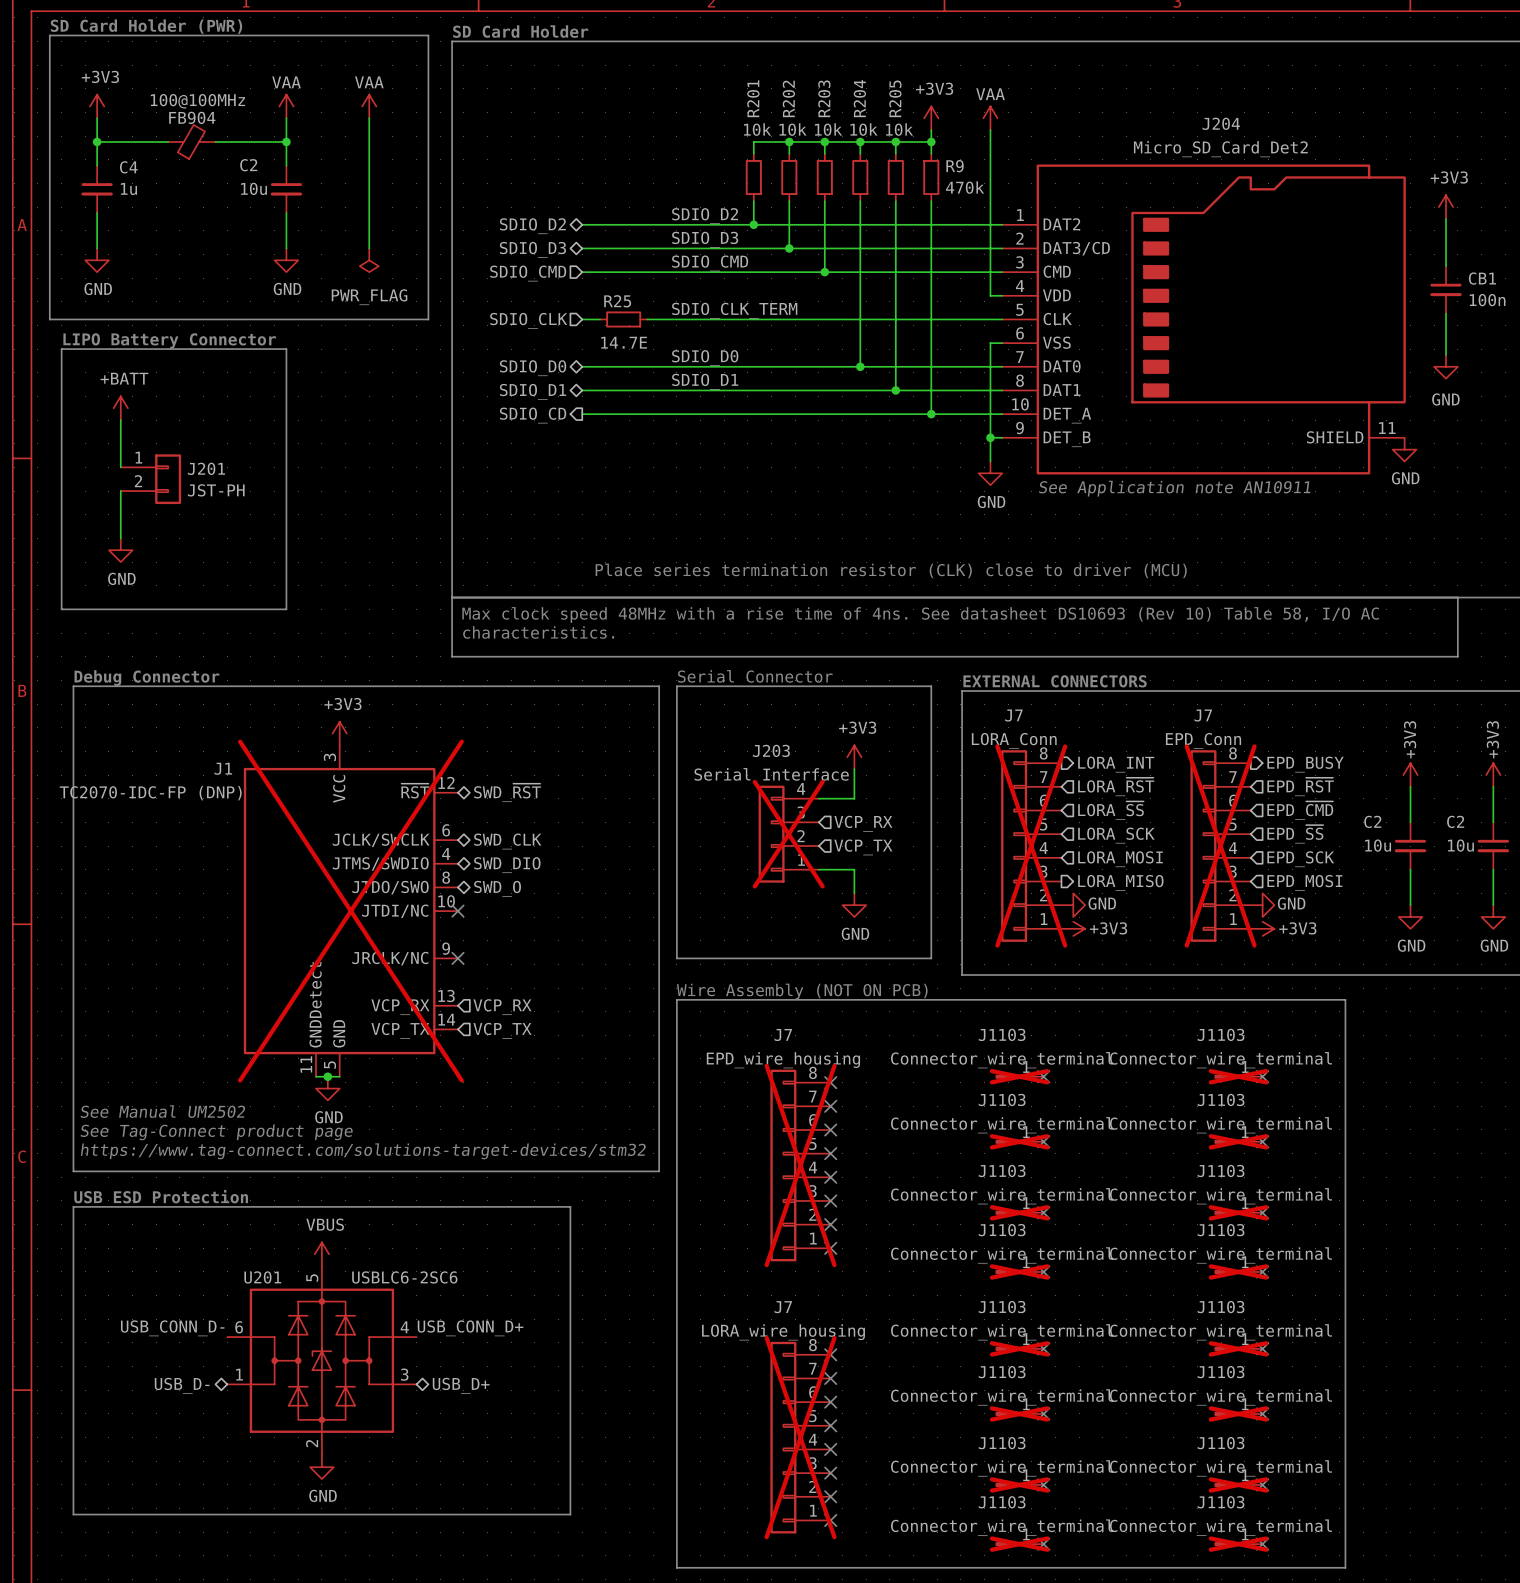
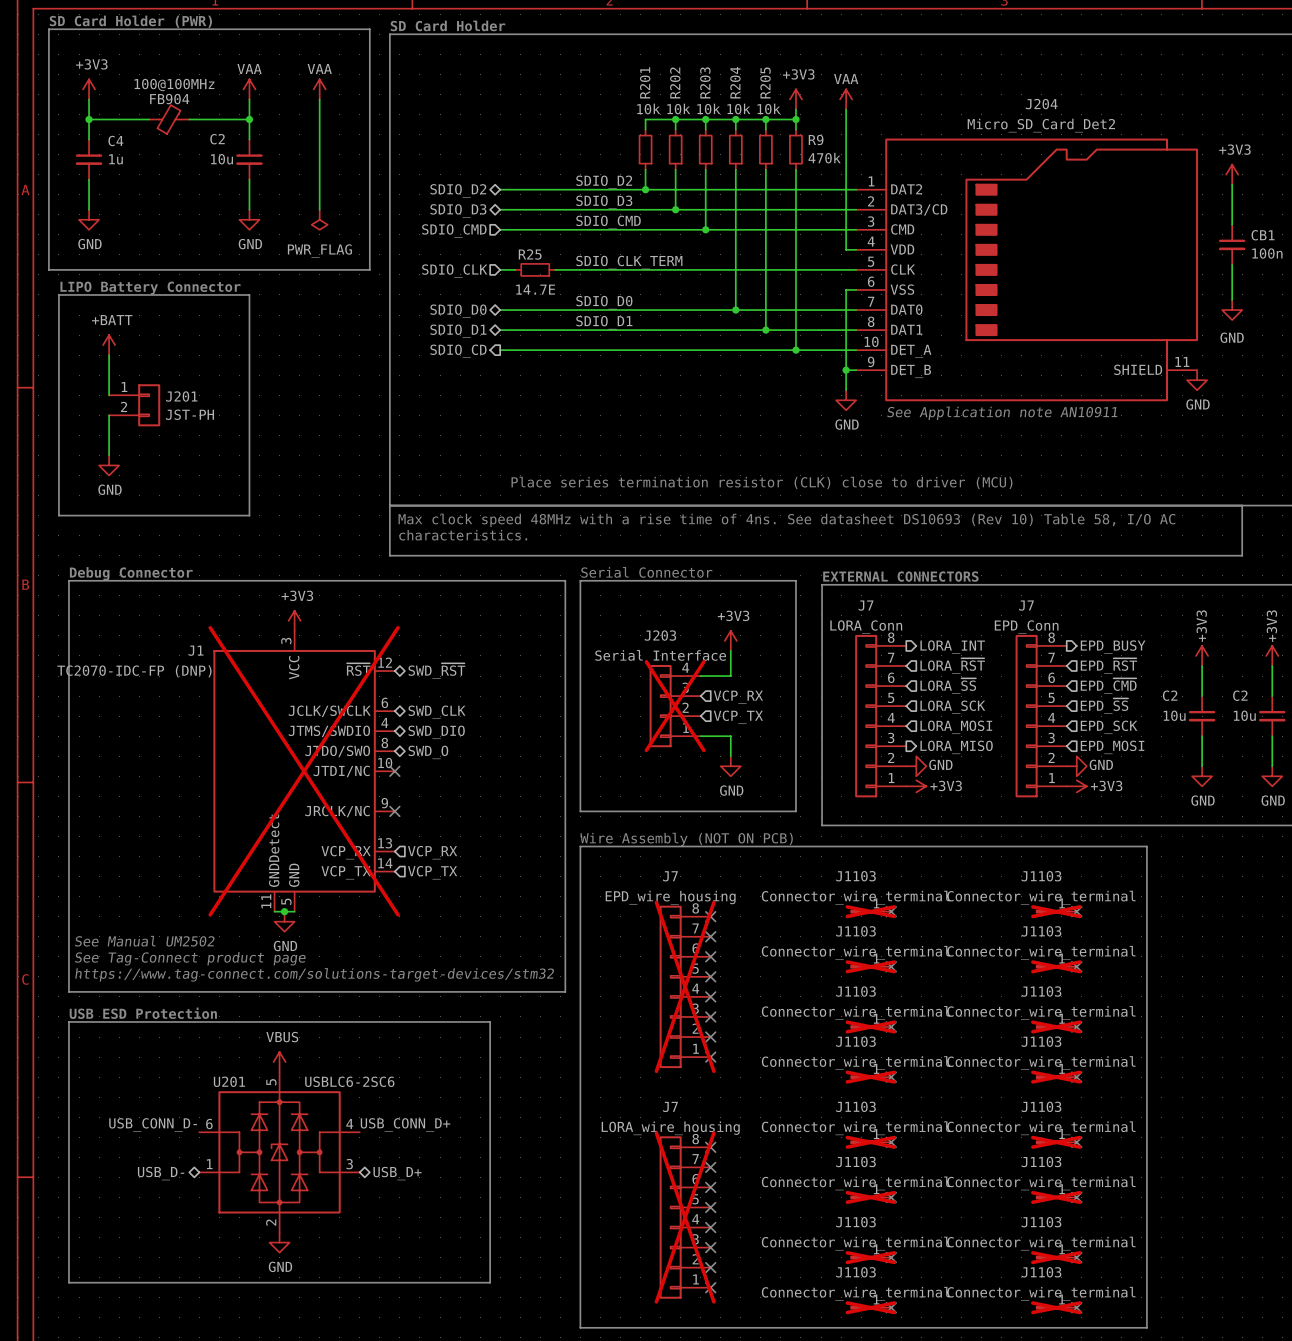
J7 do-not-place cross: (1031, 846) -> none
J7 do-not-place cross: (1220, 846) -> none

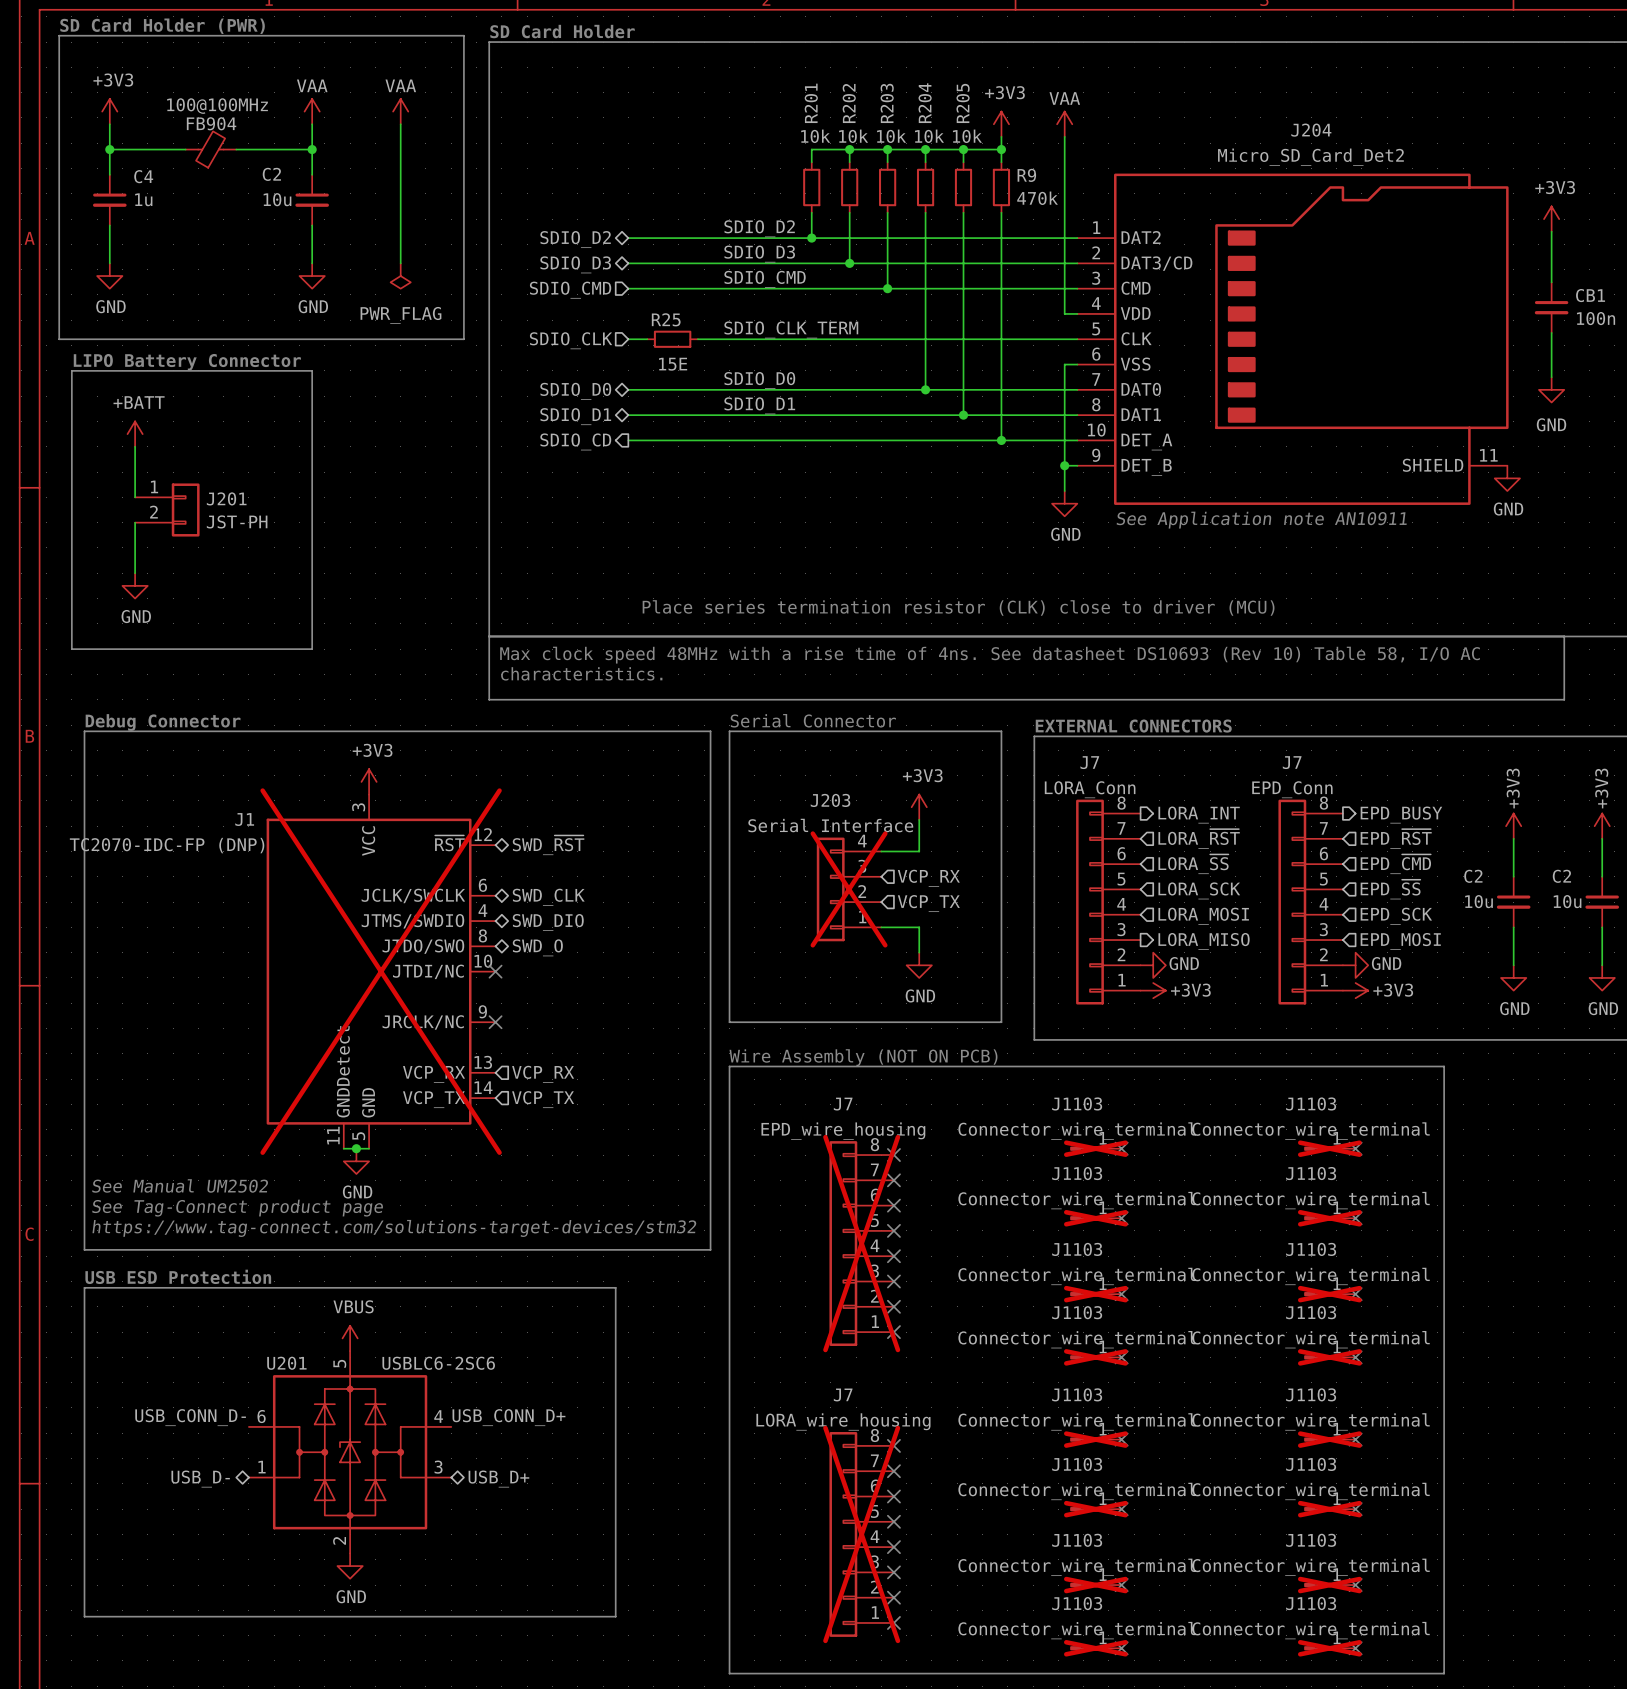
R25 value: 14.7E (535, 289) -> 15E (673, 364)

